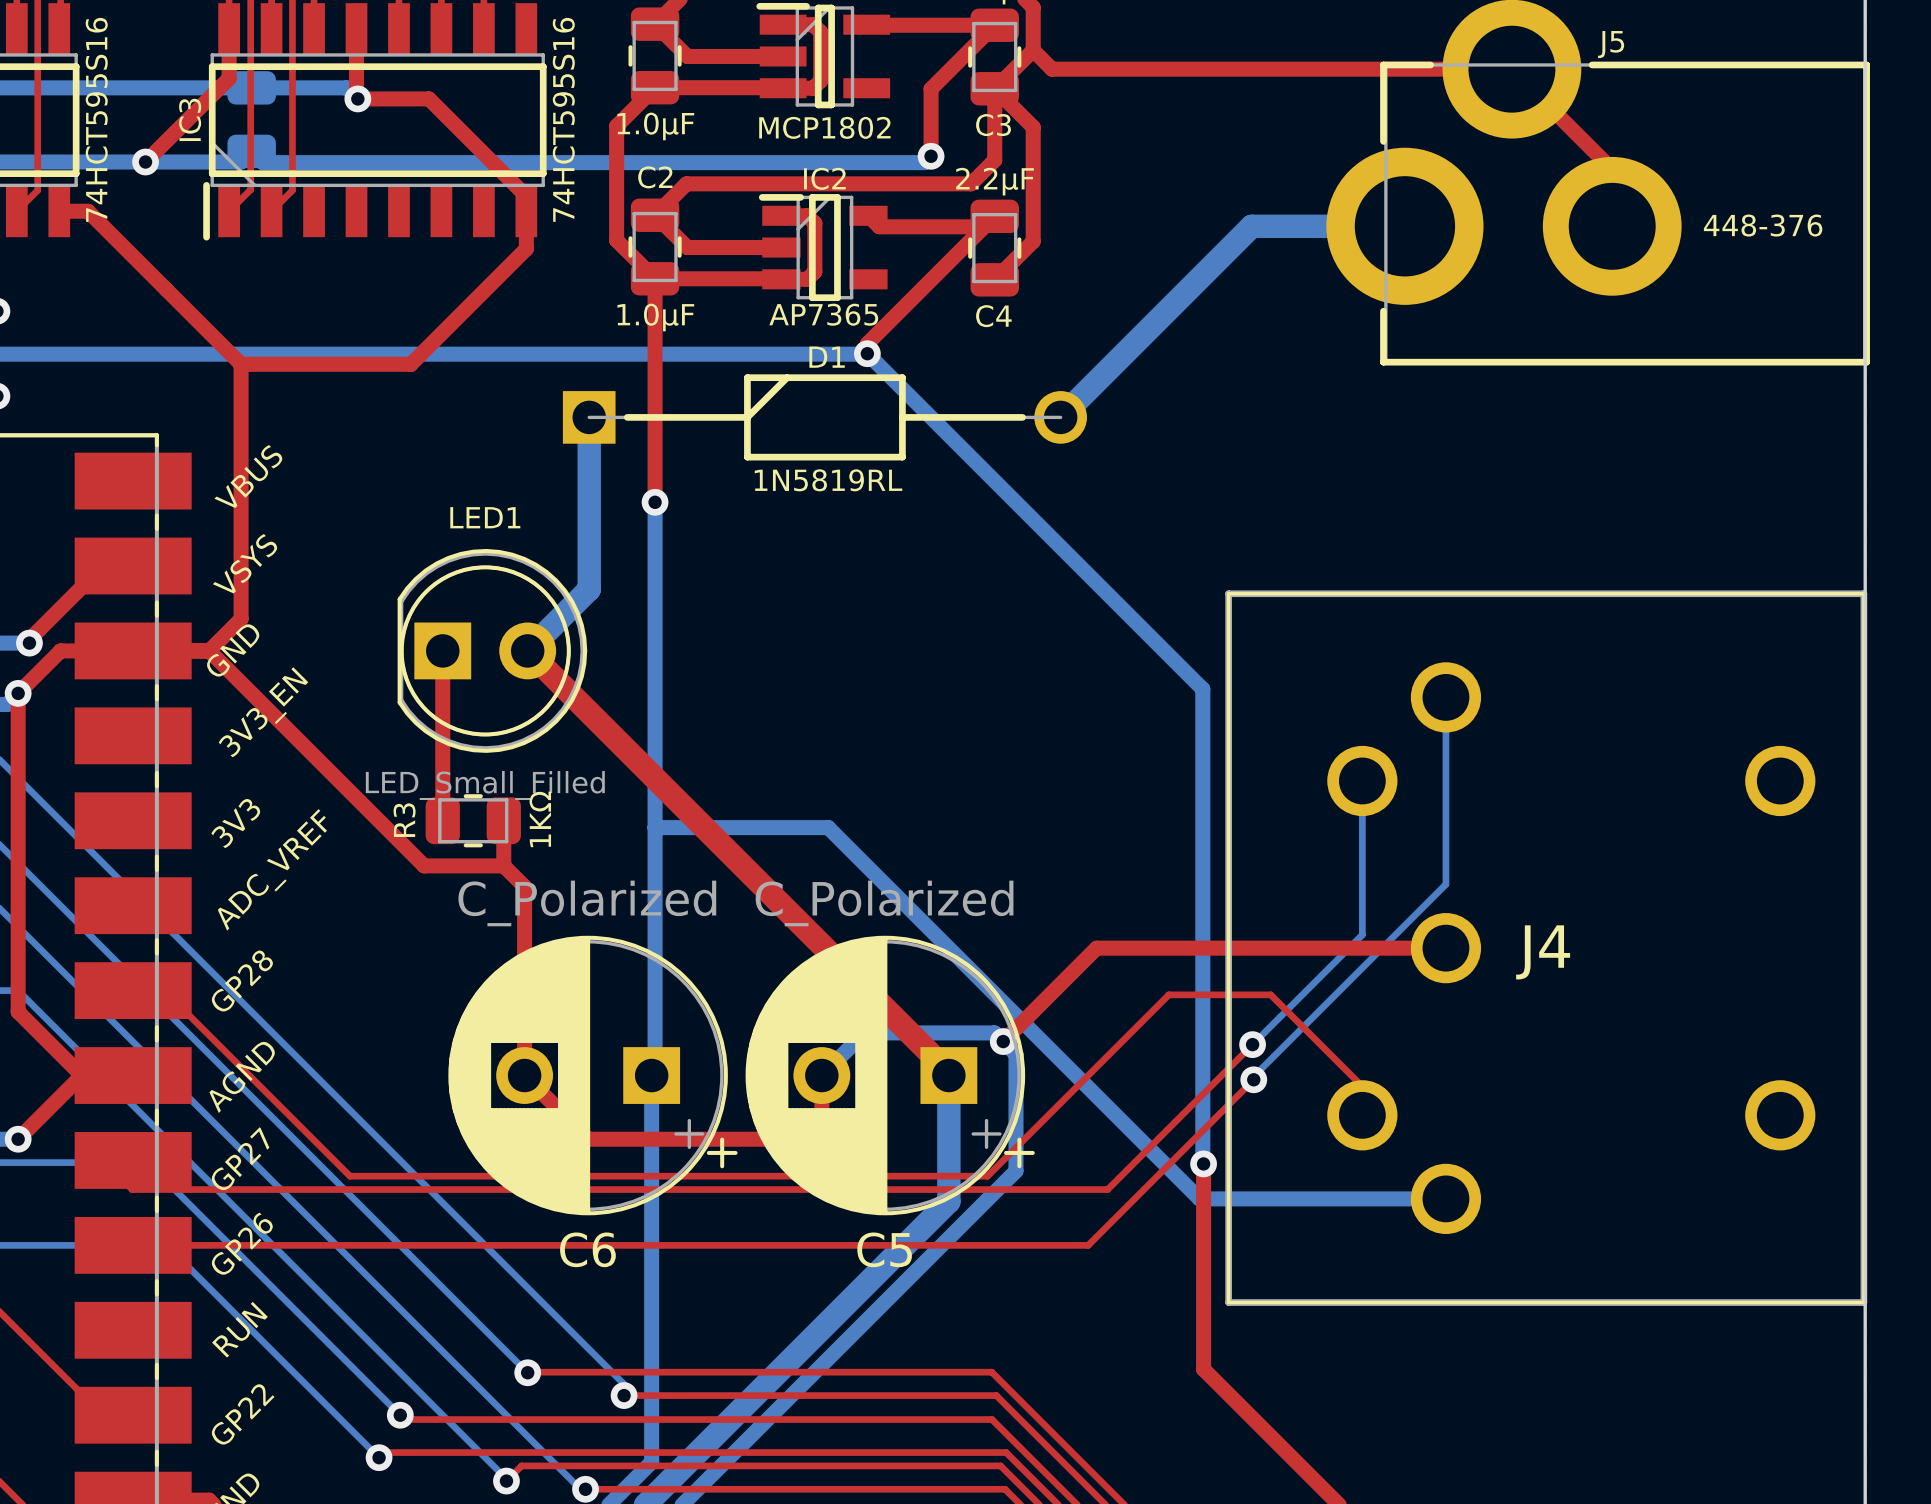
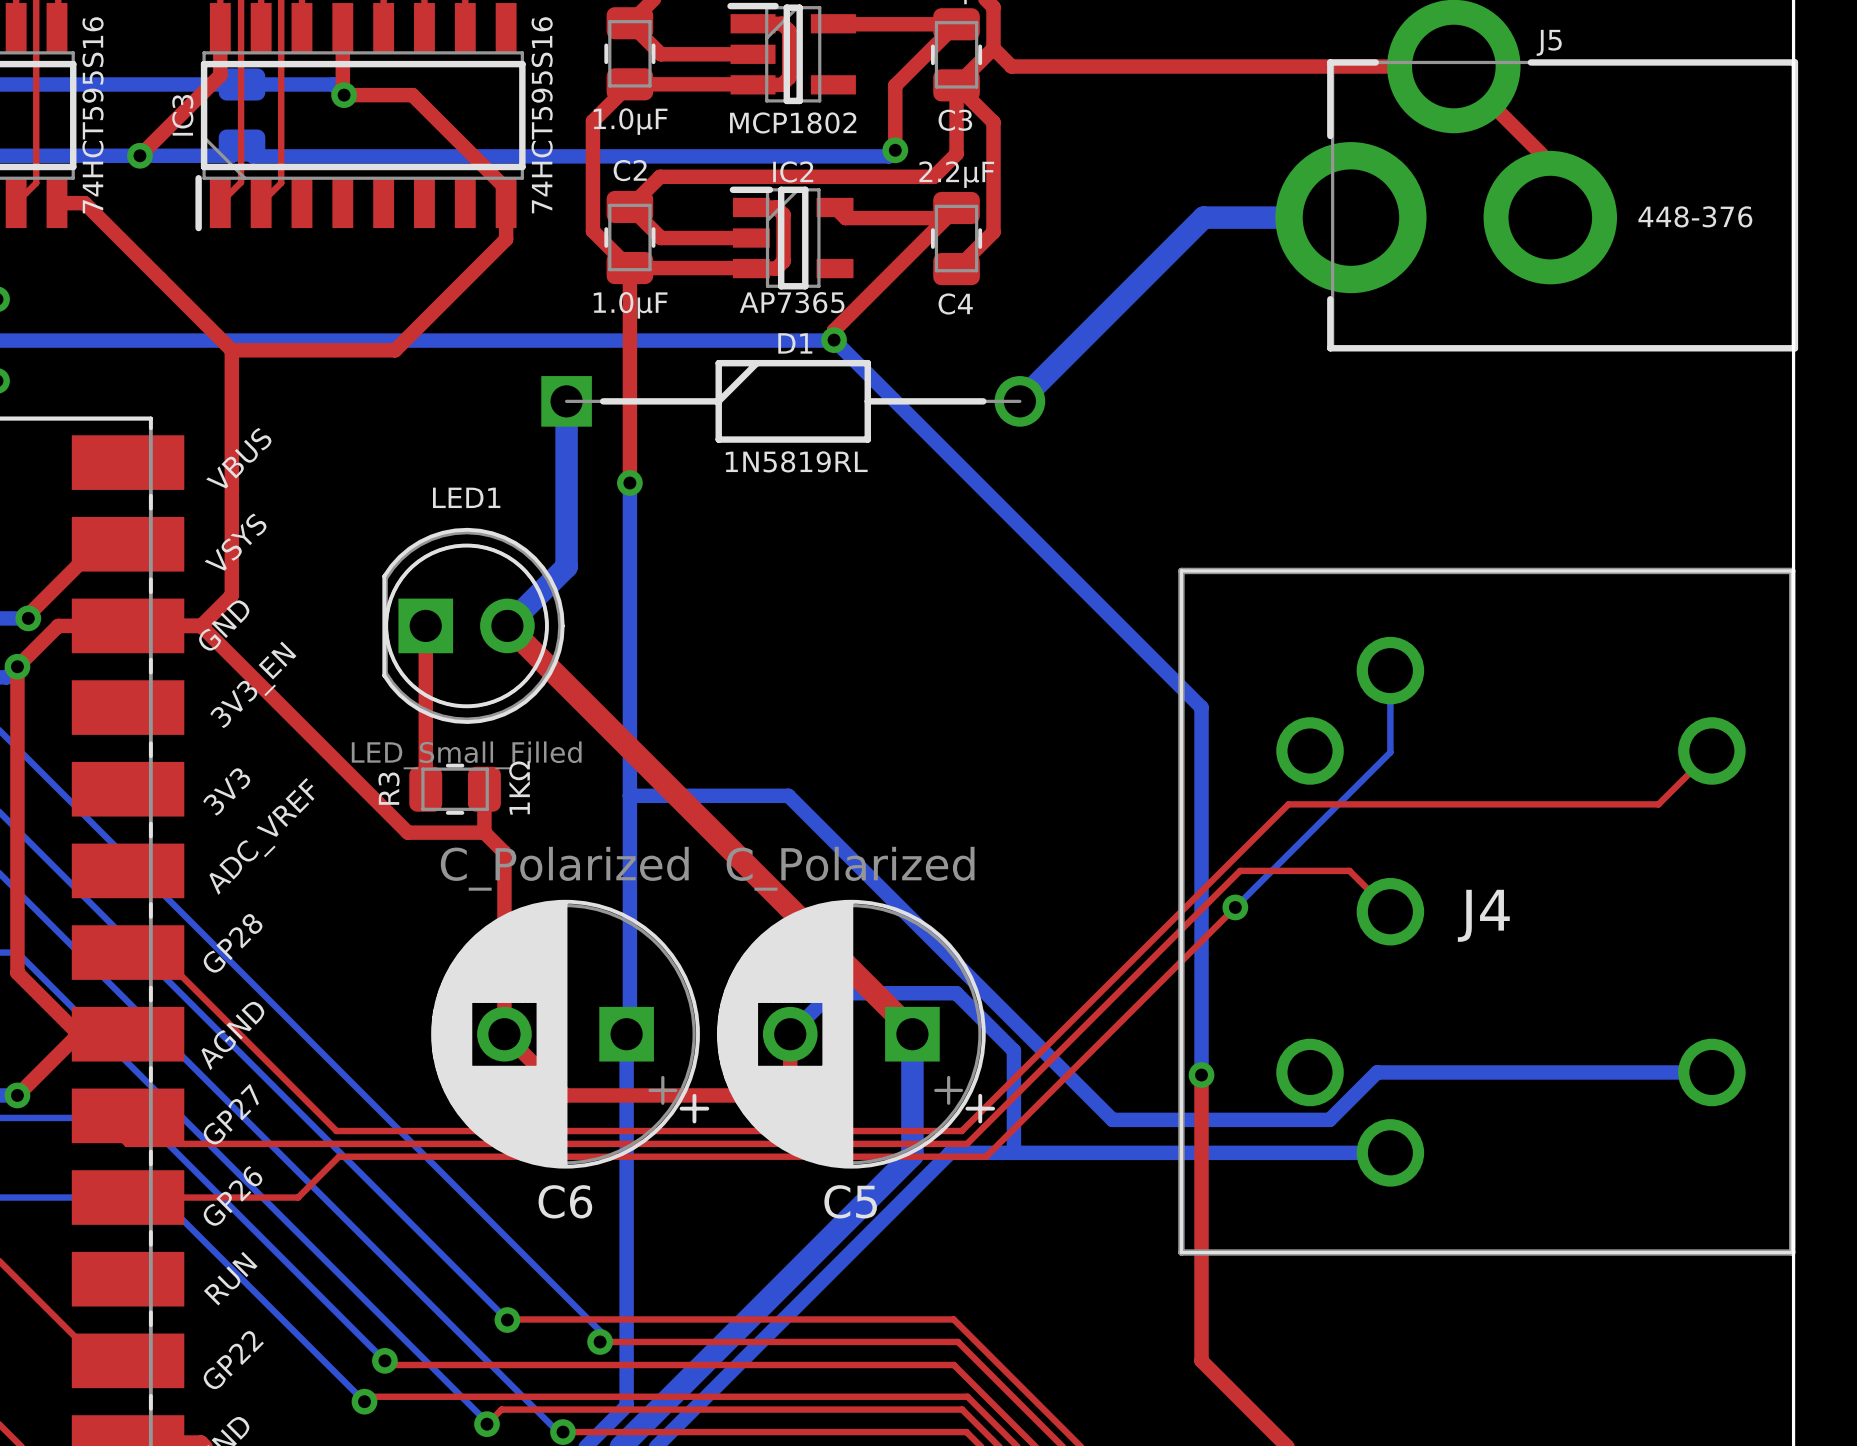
bottom track: (1202, 689) (1203, 1163) -> (1156, 662) (1201, 707) (1201, 1075)
bottom track: (1362, 780) (1362, 934) (1252, 1044) -> none
bottom track: (1445, 782) (1445, 884) (1253, 1076) (1253, 1079) -> (1390, 752) (1235, 907)
bottom track: (820, 827) (828, 827) (1199, 1198) -> (950, 1152) (1153, 1152)
bottom track: none -> (788, 795) (1112, 1119) (1329, 1119) (1377, 1072) (1711, 1072)
via: none -> (1235, 907)
top track: (1440, 960) (1445, 955) (1445, 948) (1096, 948) (1003, 1041) -> none
via: (1003, 1041) -> none
top track: (1252, 1044) (1107, 1189) (1005, 1189) -> (1390, 911) (1349, 870) (1240, 870) (967, 1143)
via: (1252, 1044) -> none
bottom track: (1015, 1054) (1015, 1171) (988, 1198) -> (976, 1013) (1013, 1050) (1013, 1152)
top track: (1253, 1079) (1088, 1245) (310, 1245) -> (1235, 907) (986, 1156) (338, 1156) (298, 1197)
via: (1253, 1079) -> none
top track: (1362, 1115) (1362, 1086) (1270, 994) (1168, 994) (987, 1176) -> (1711, 750) (1658, 804) (1288, 804) (961, 1131) (949, 1131)
via: none -> (1201, 1075)
top track: (1203, 1163) (1203, 1369) (1249, 1415) -> (1201, 1075) (1201, 1360)
via: (1203, 1163) -> none

